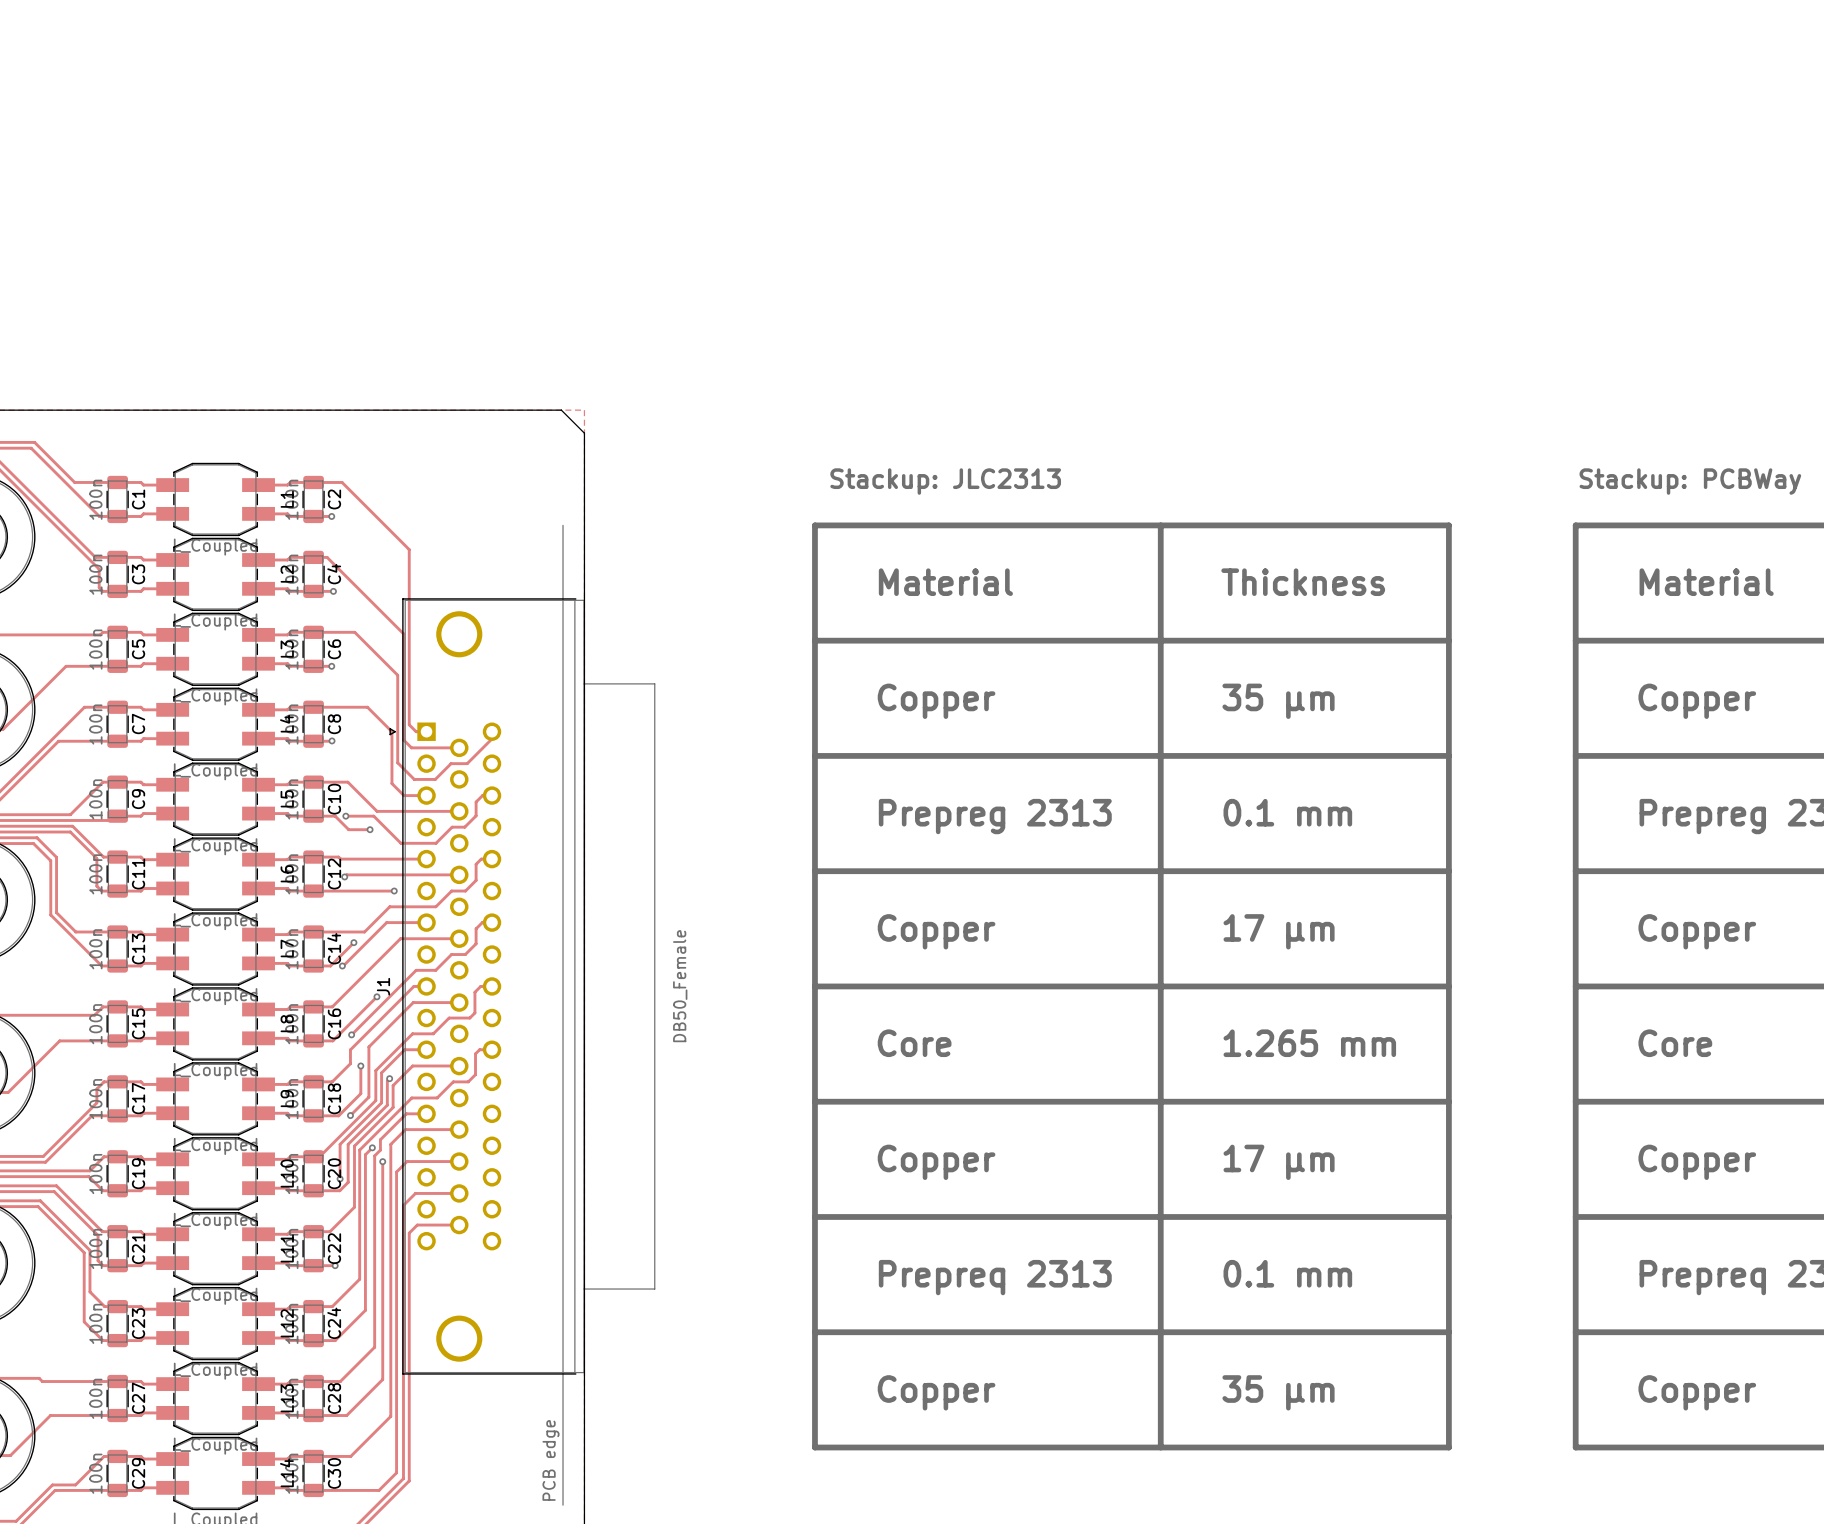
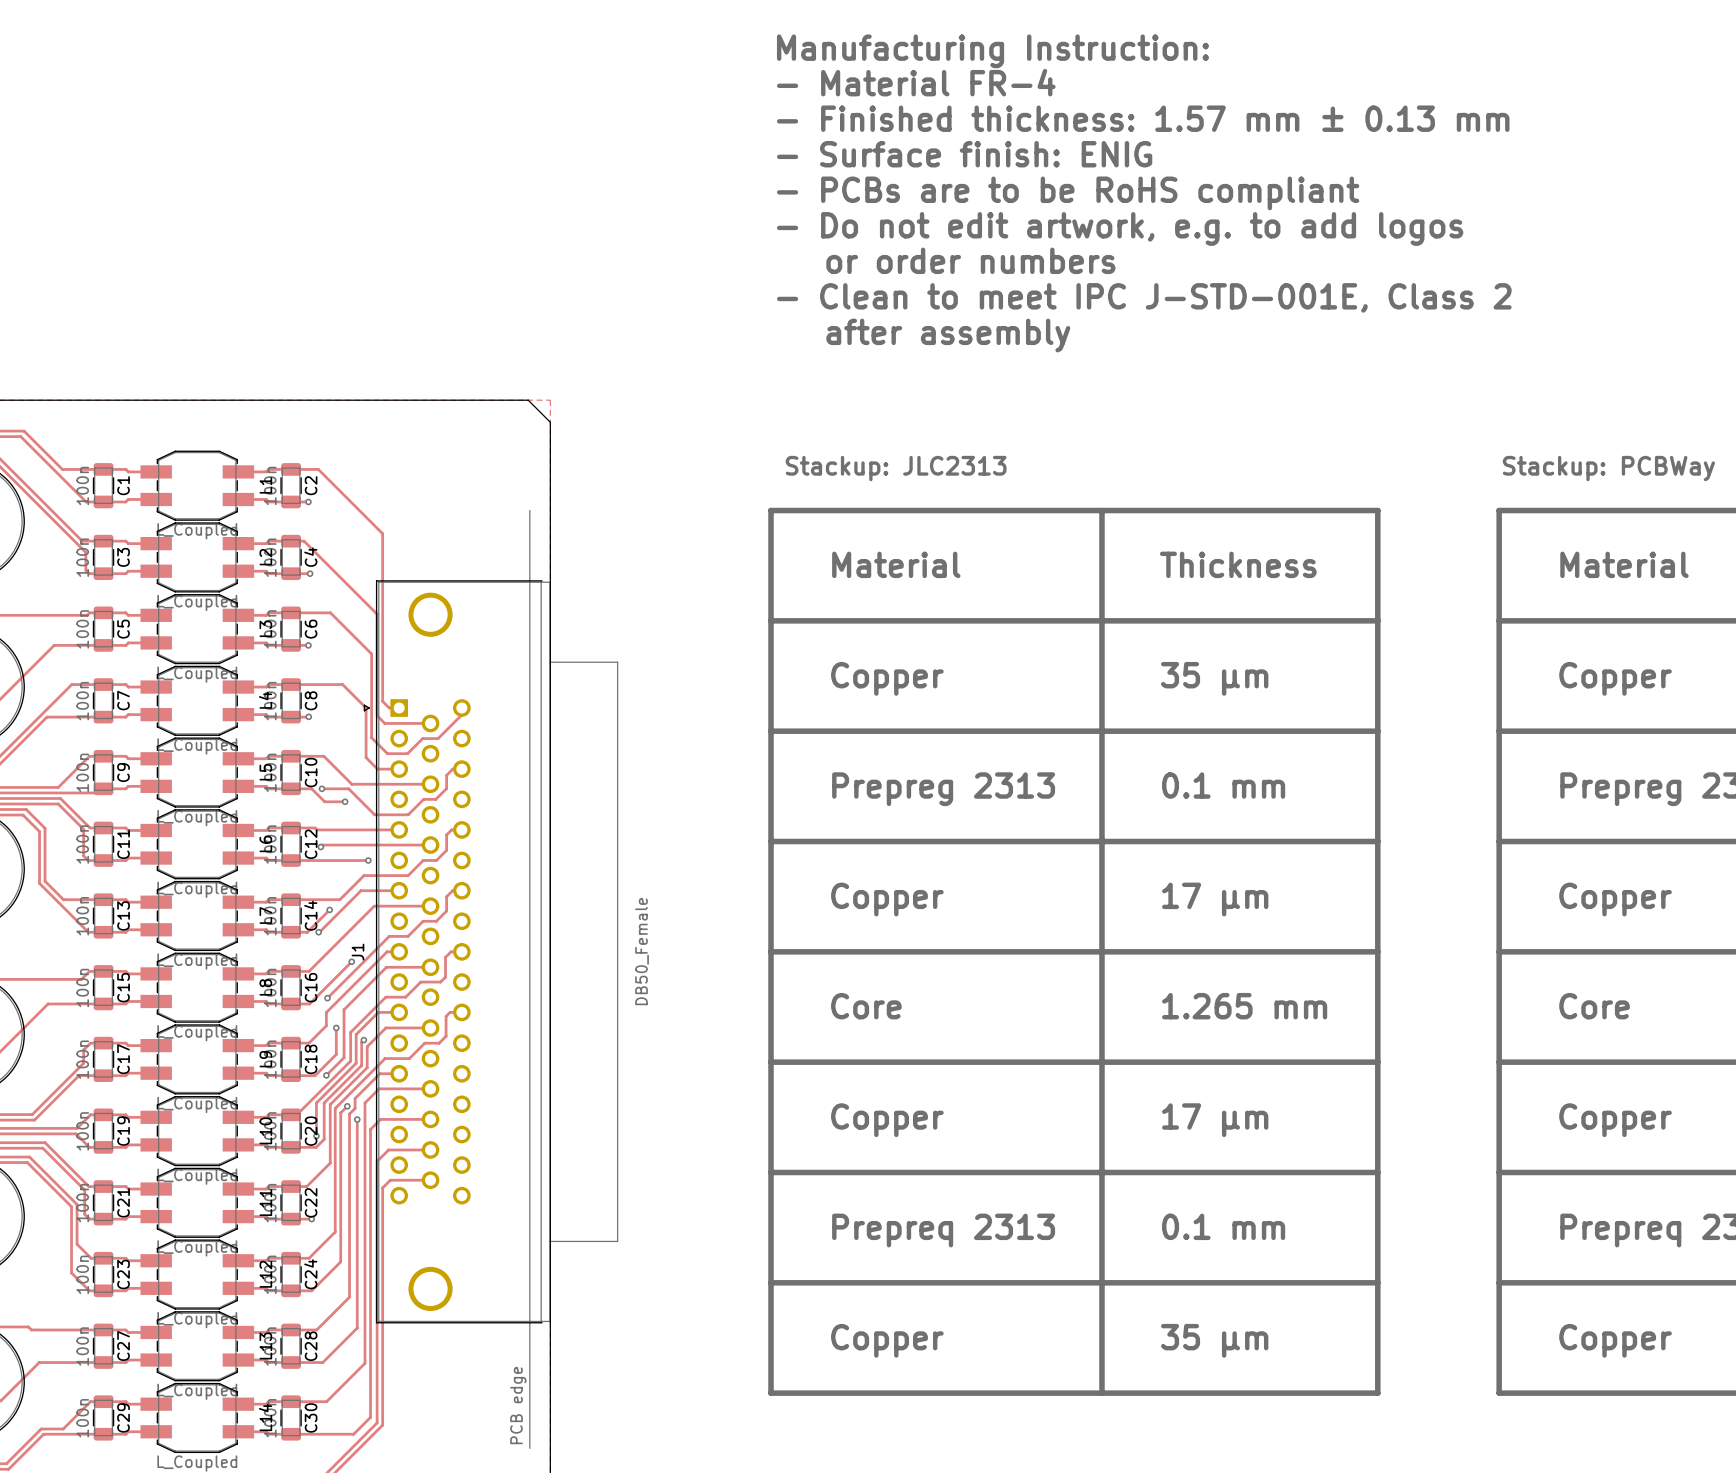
text: none -> Manufacturing Instruction: (992, 51)
text: none -> - Material FR-4 (916, 82)
text: none -> - Finished thickness: 1.57 mm ± 0.13 mm (1143, 118)
text: none -> - Surface finish: ENIG (964, 154)
text: none -> - PCBs are to be RoHS compliant (1068, 193)
text: none -> - Do not edit artwork, e.g. to add logos (1120, 228)
text: none -> or order numbers (970, 260)
text: none -> - Clean to meet IPC J-STD-001E, Class 2 (1144, 297)
text: none -> after assembly (948, 335)

